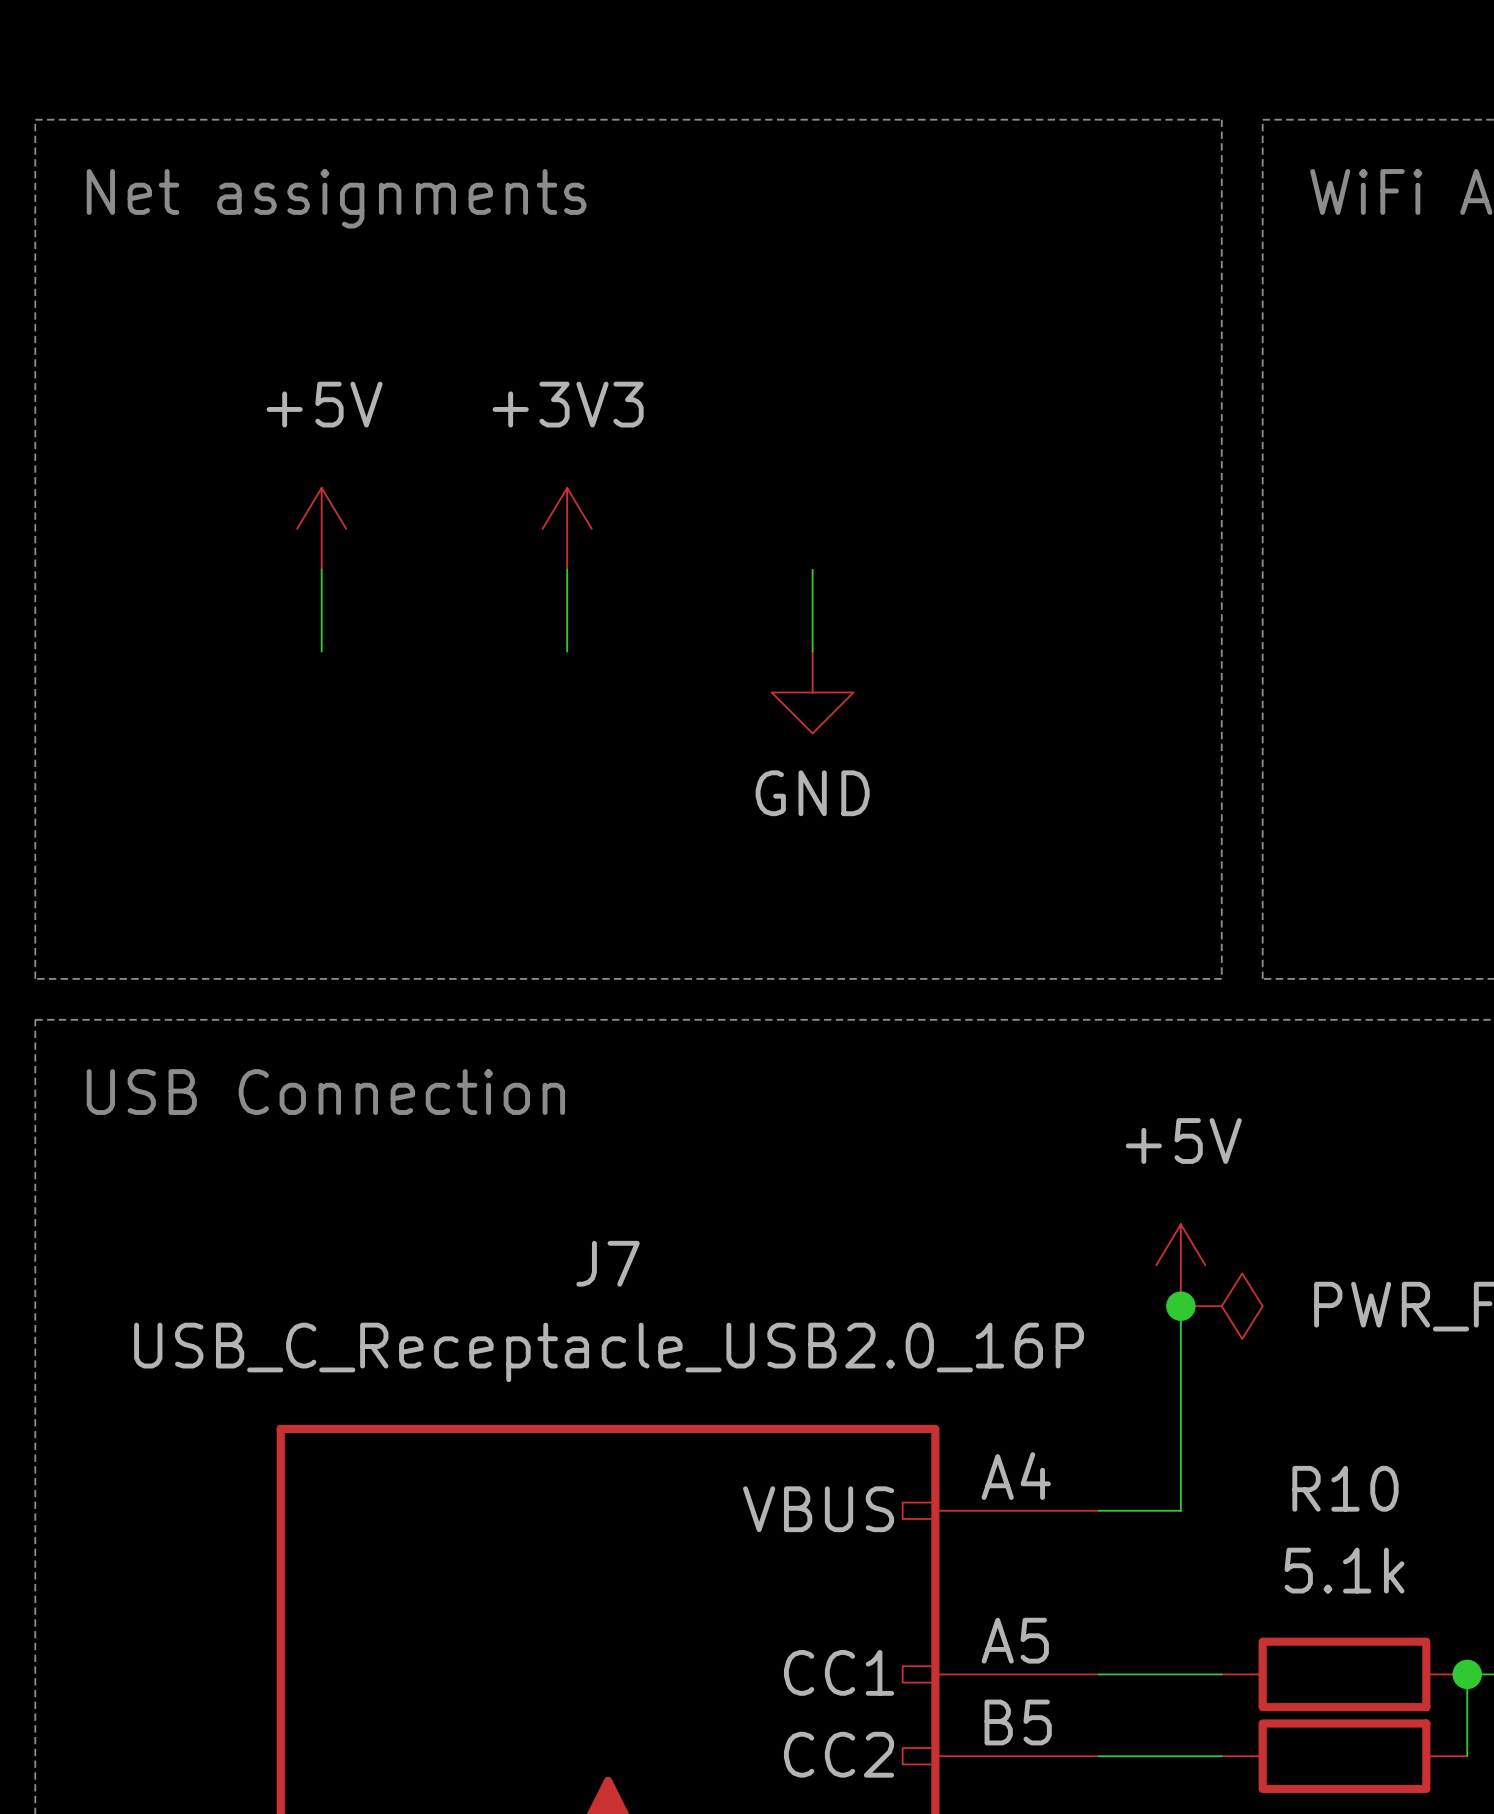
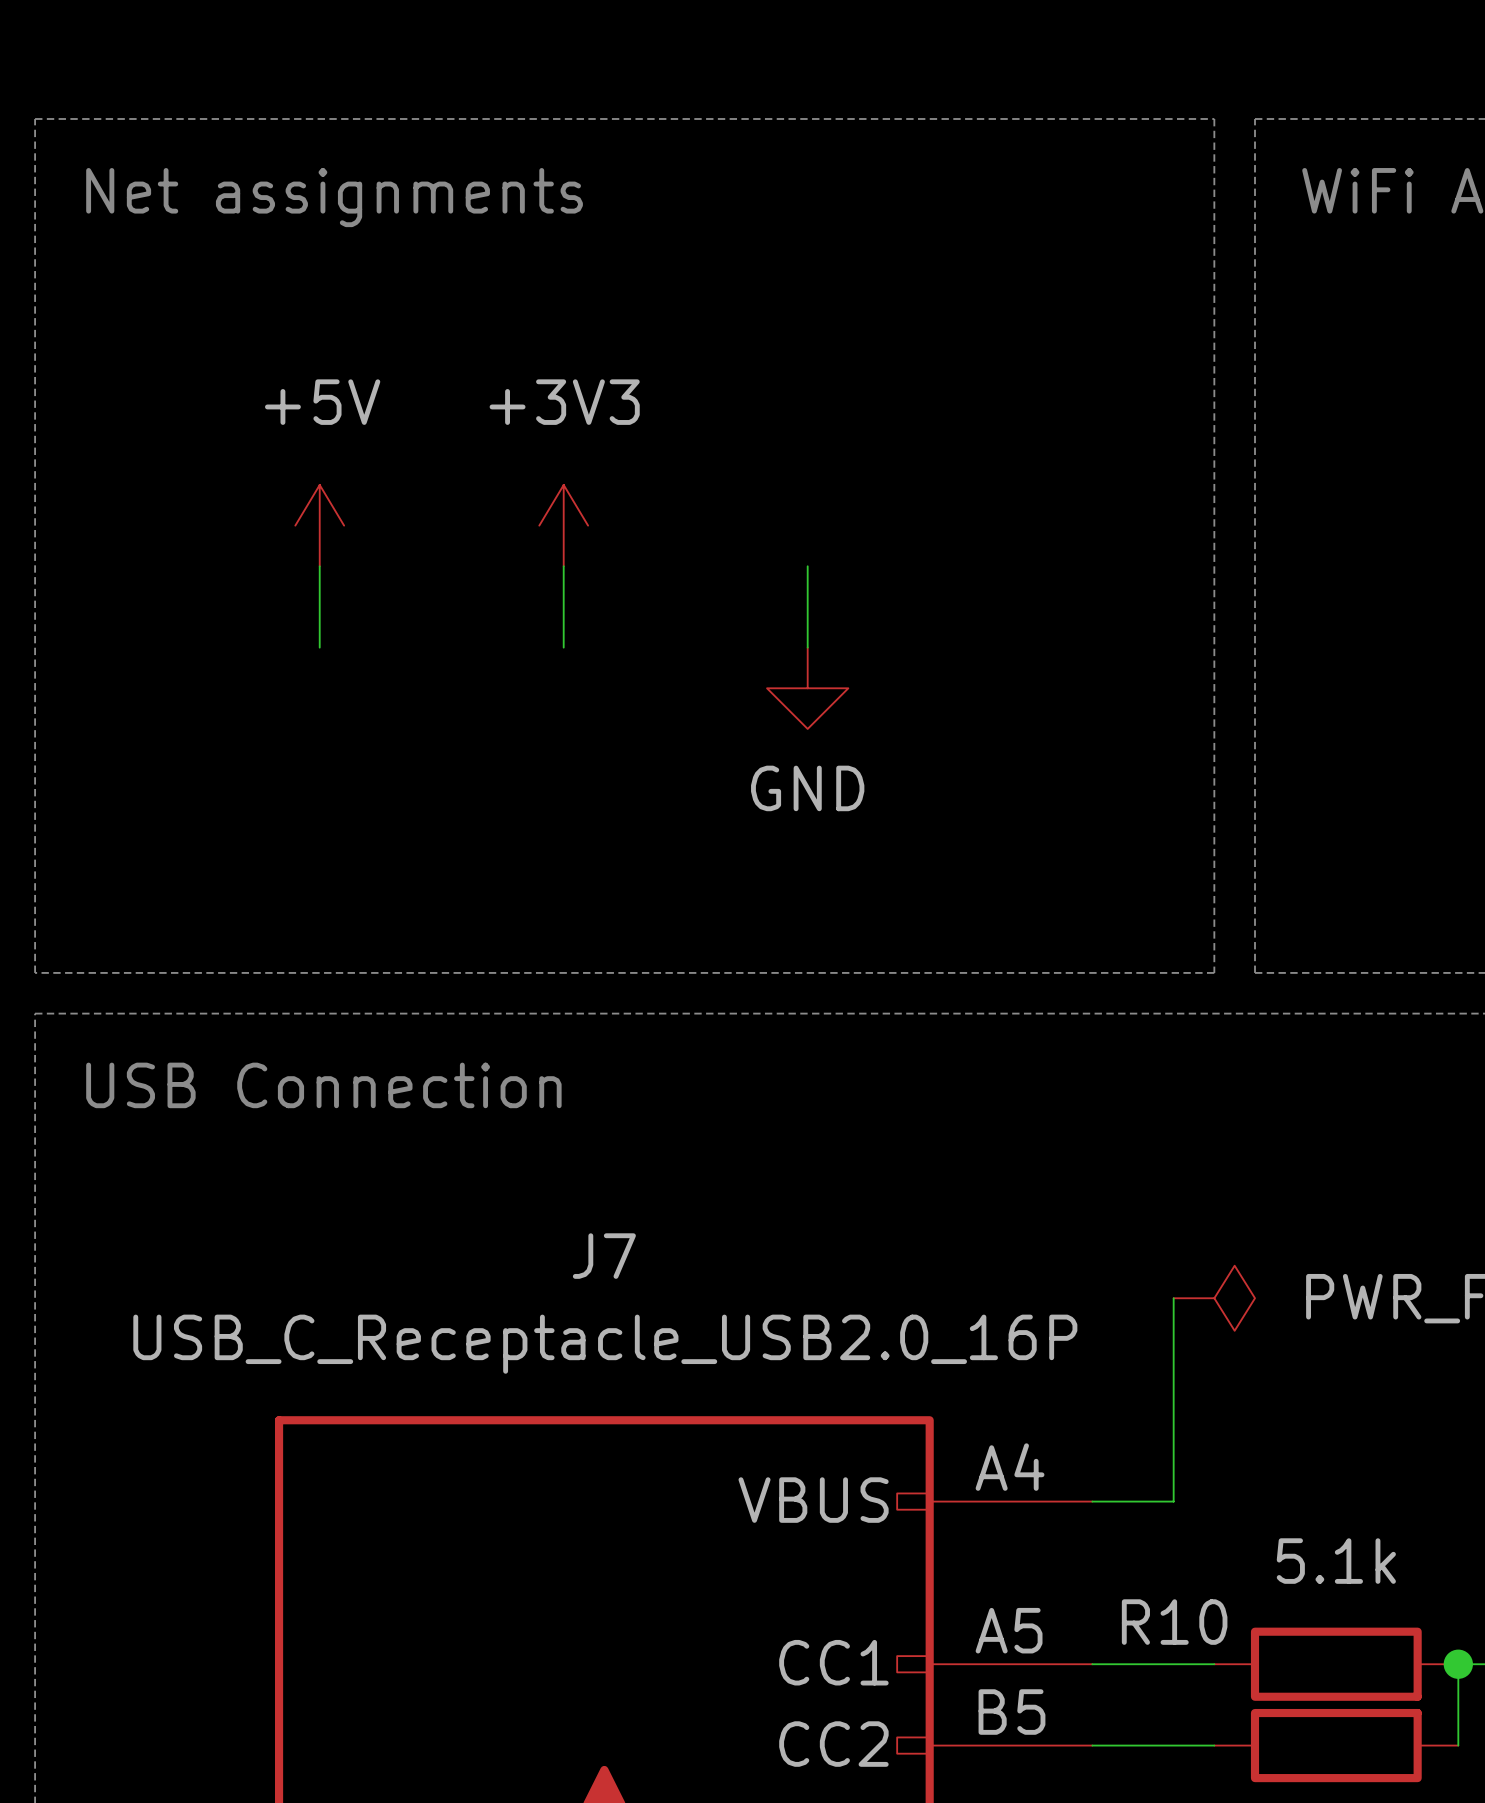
power symbol: +5V (1180, 1265) -> none
junction: (1180, 1306) -> none
R10 name position: R10 (1345, 1488) -> R10 (1174, 1622)

